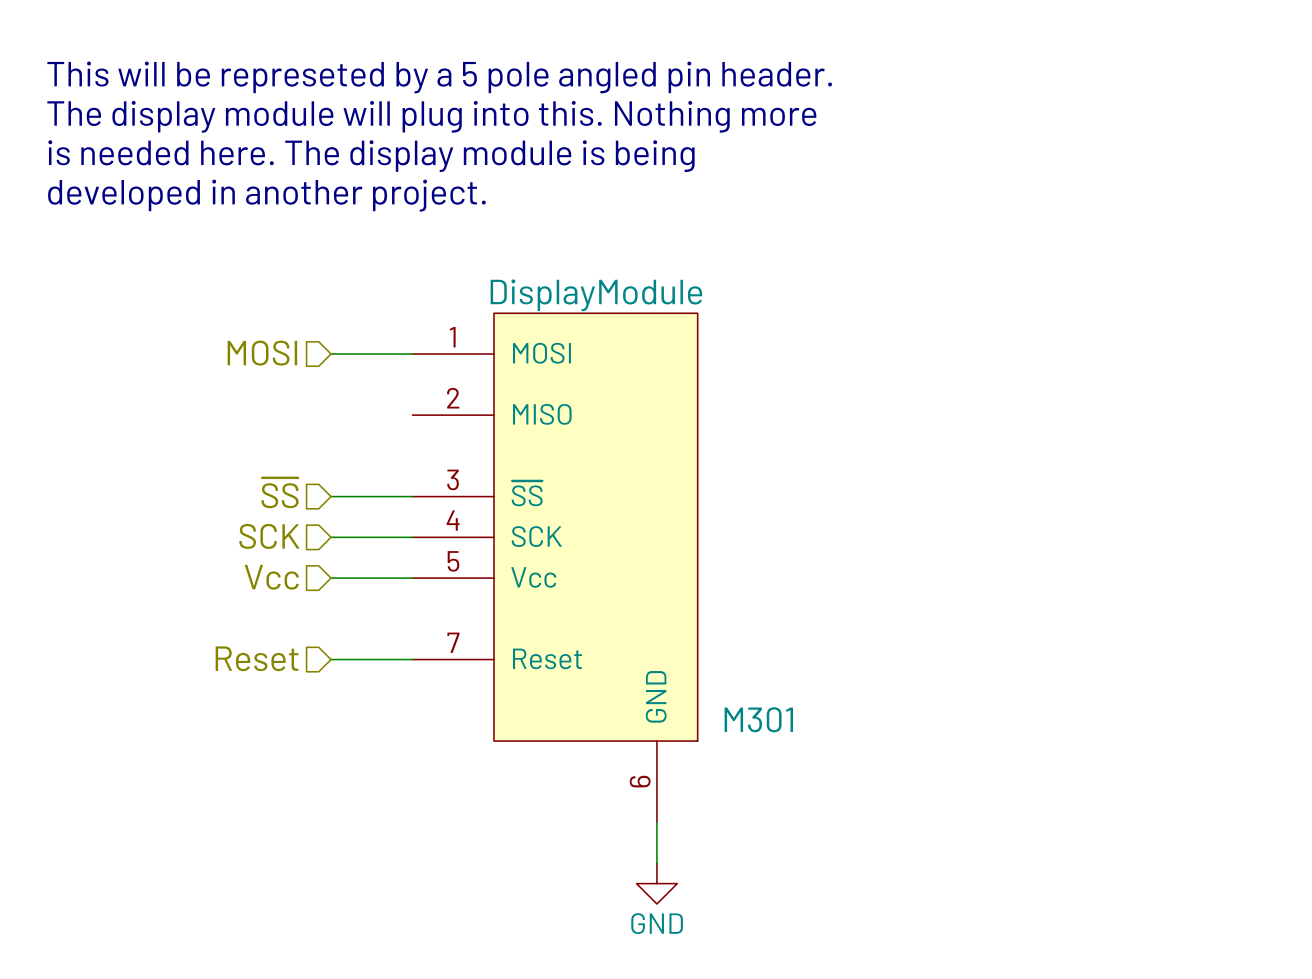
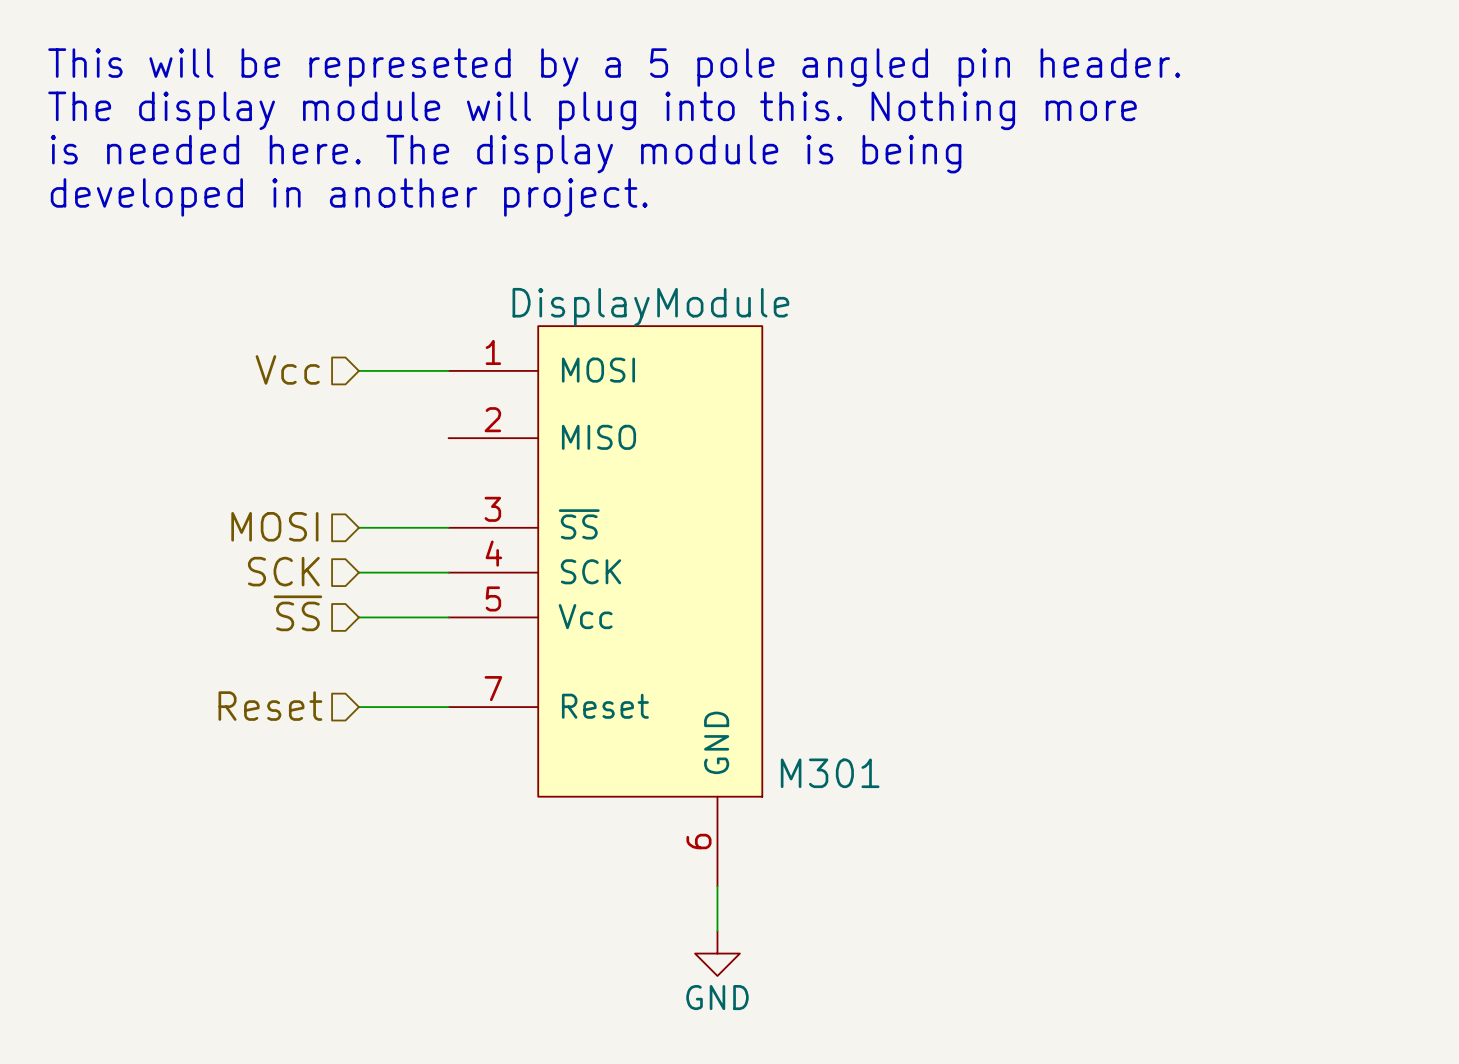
hierarchical label: MOSI (262, 353) -> Vcc (287, 369)
hierarchical label: ~{SS} (280, 493) -> MOSI (274, 526)
hierarchical label: Vcc (271, 577) -> ~{SS} (297, 613)

